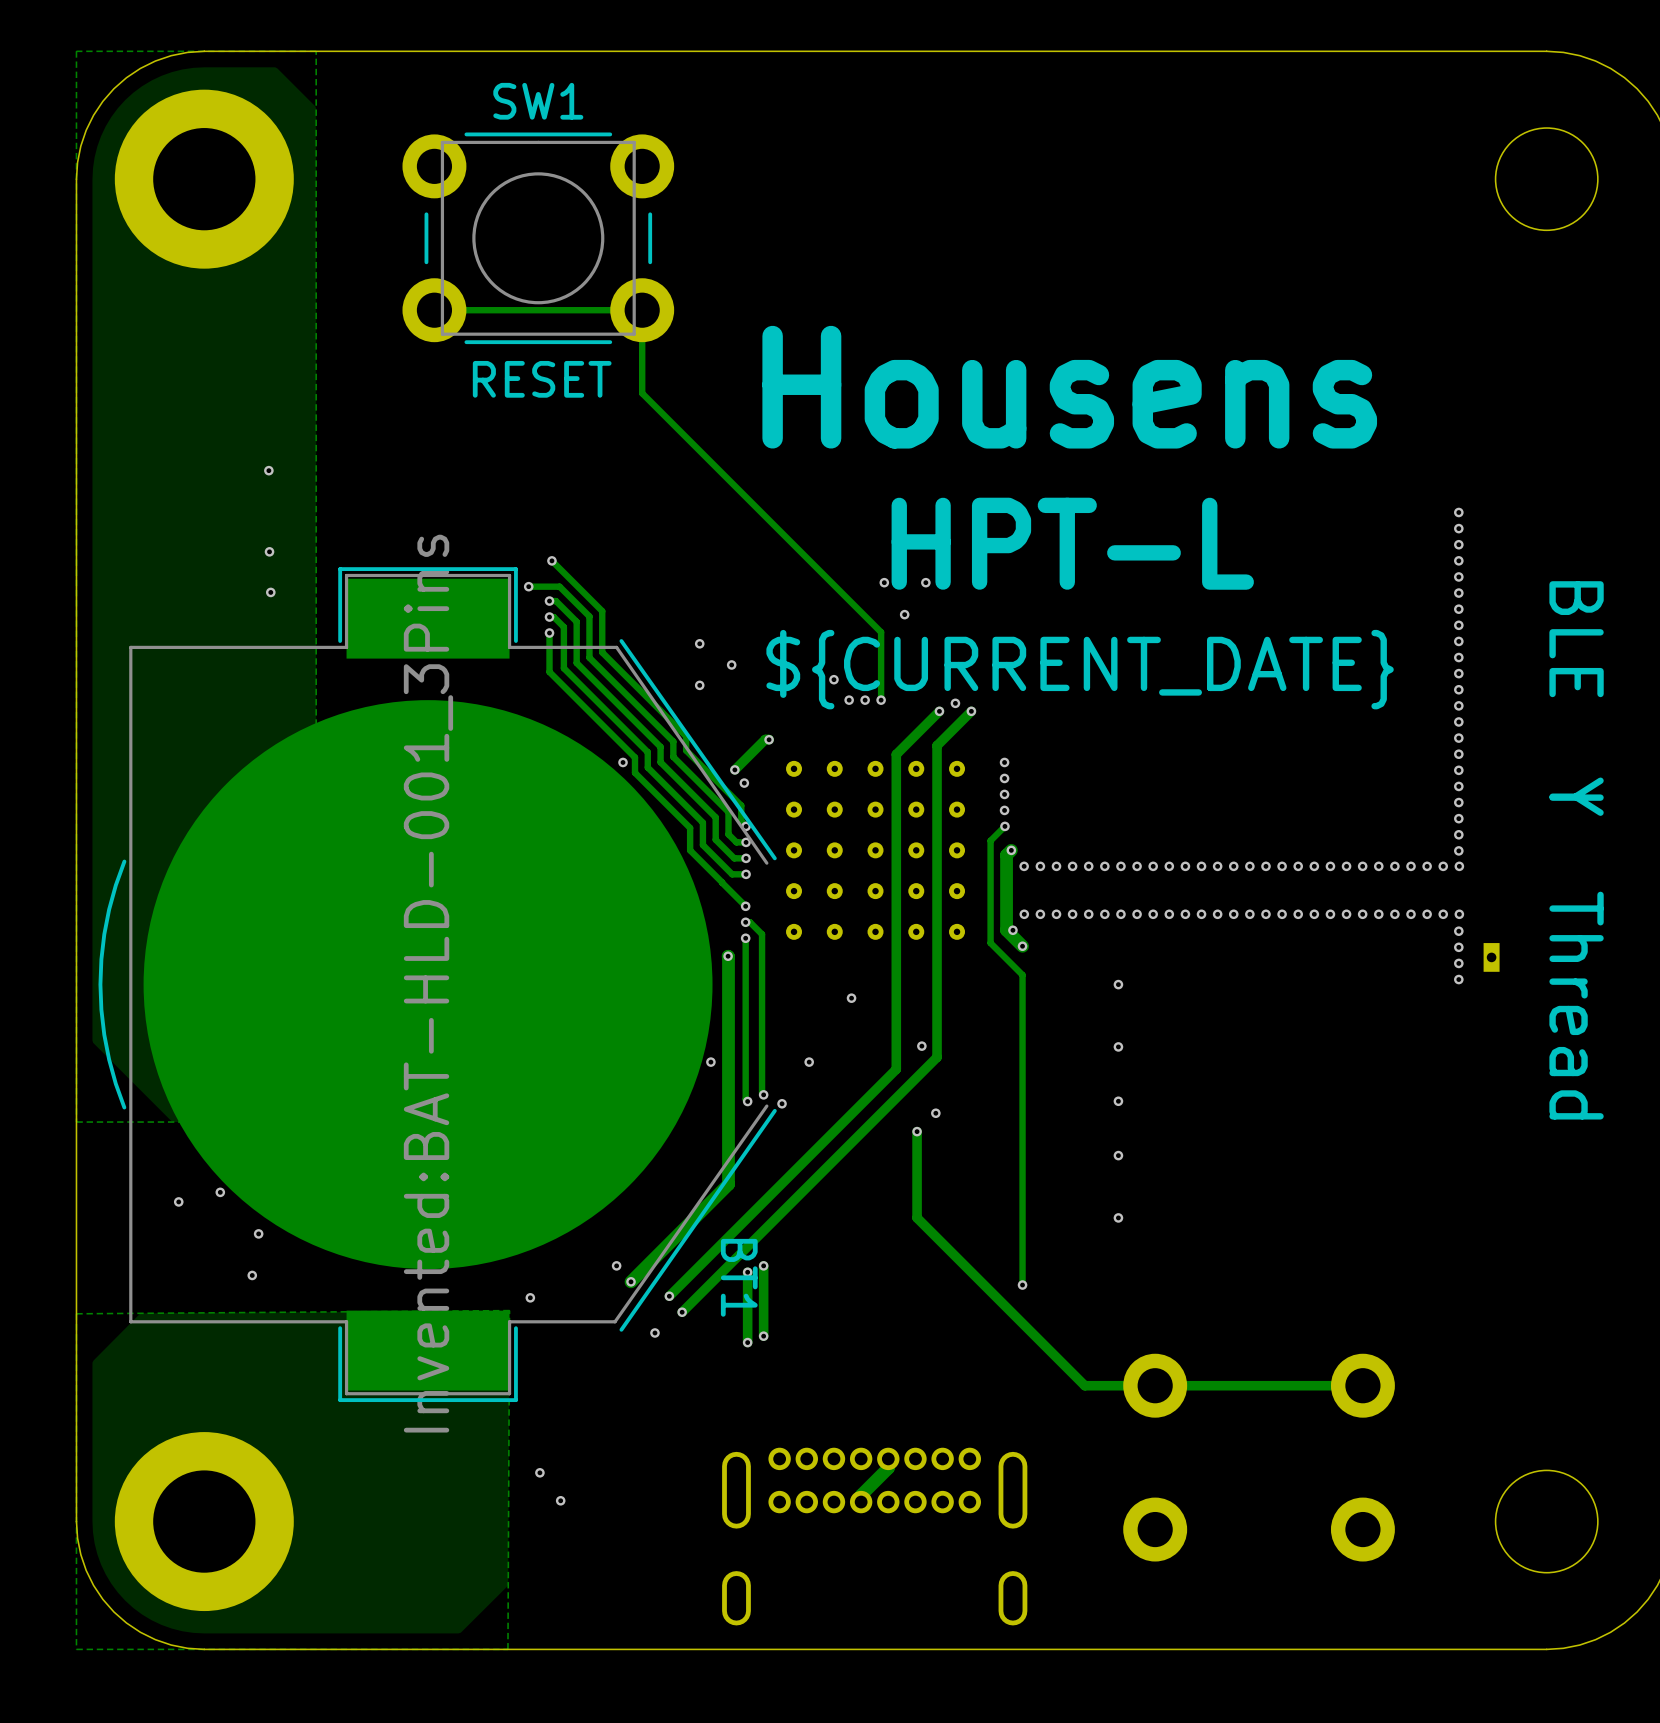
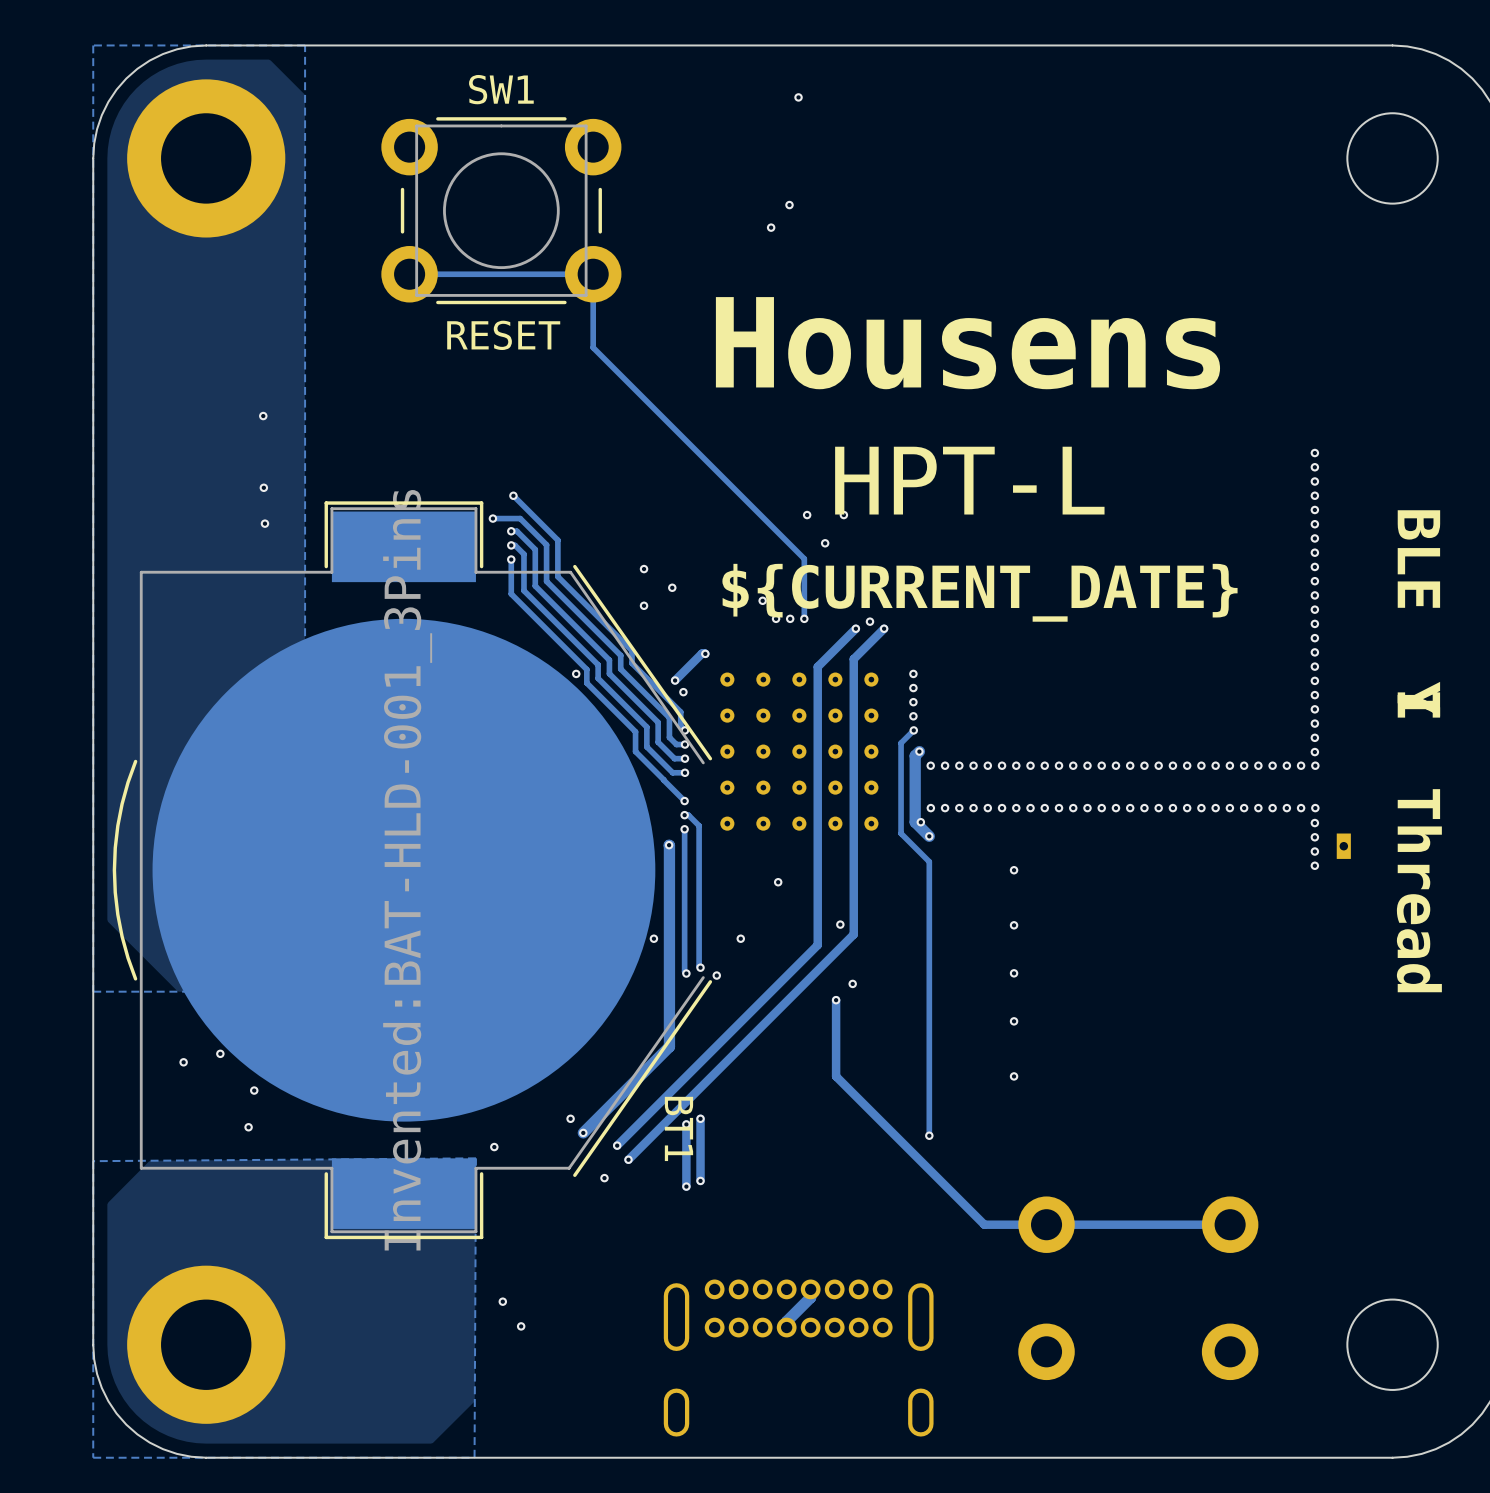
via: none -> (798, 97)
via: none -> (789, 205)
via: none -> (771, 227)

